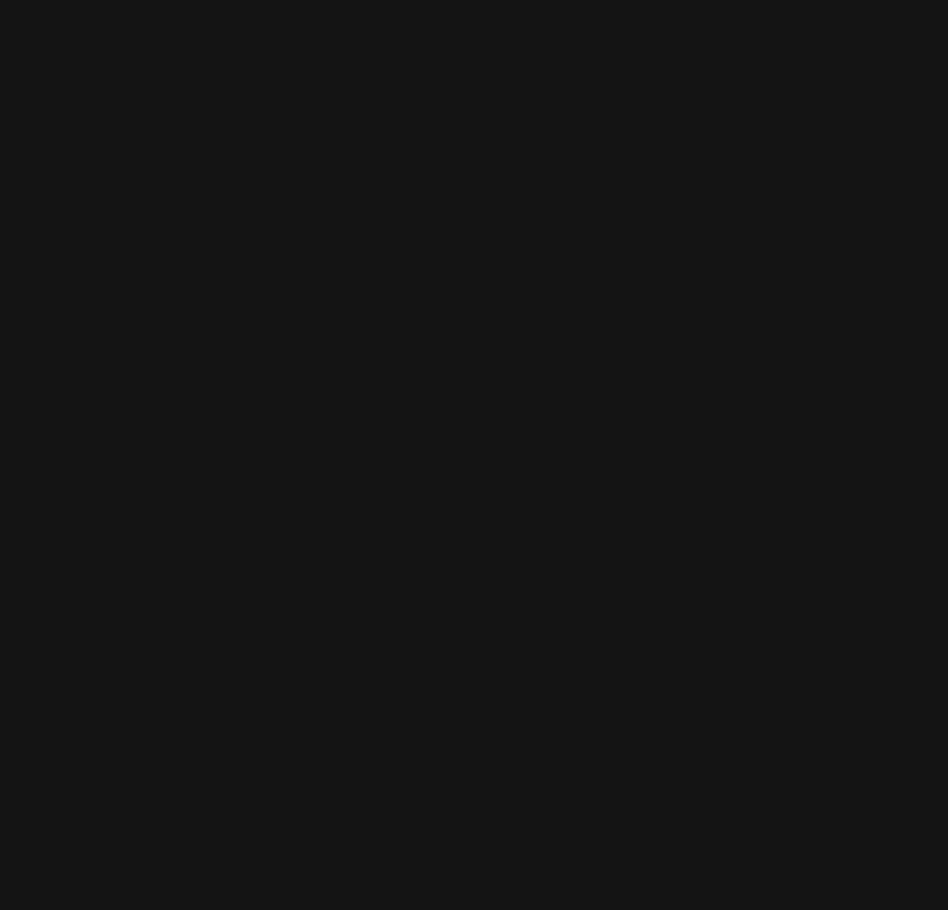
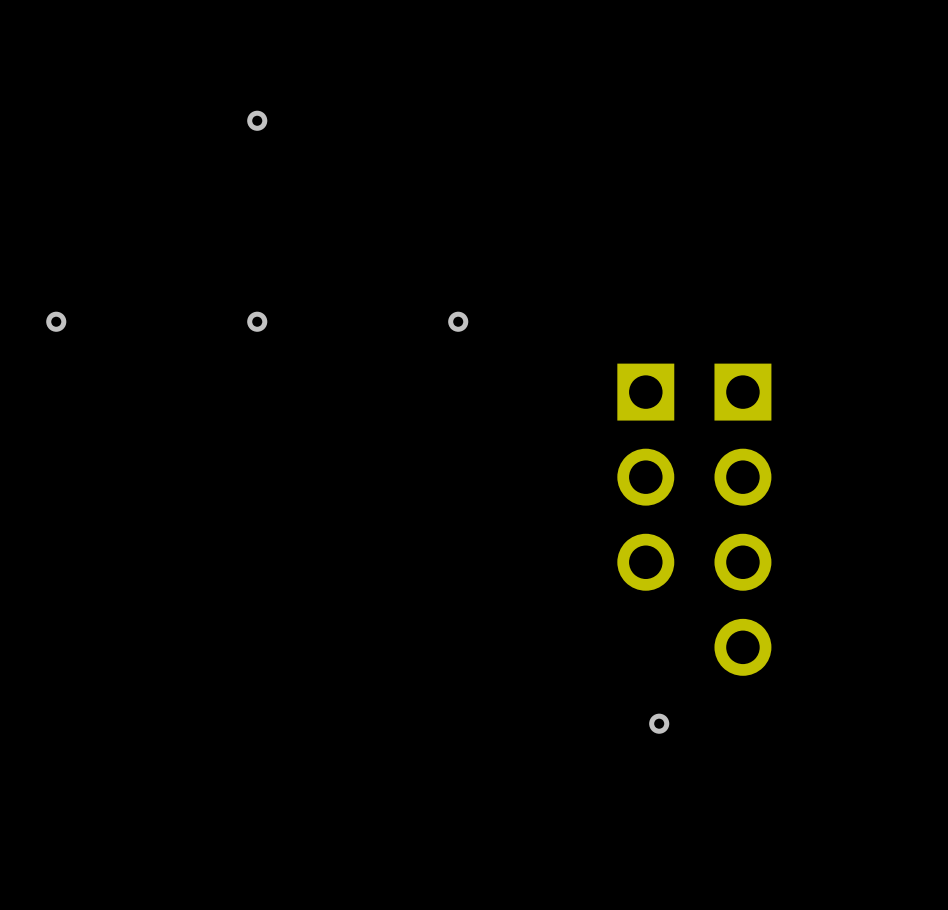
via: none -> (257, 120)
via: none -> (56, 321)
via: none -> (257, 321)
via: none -> (458, 321)
part: none -> (645, 477)
part: none -> (742, 519)
via: none -> (659, 723)

